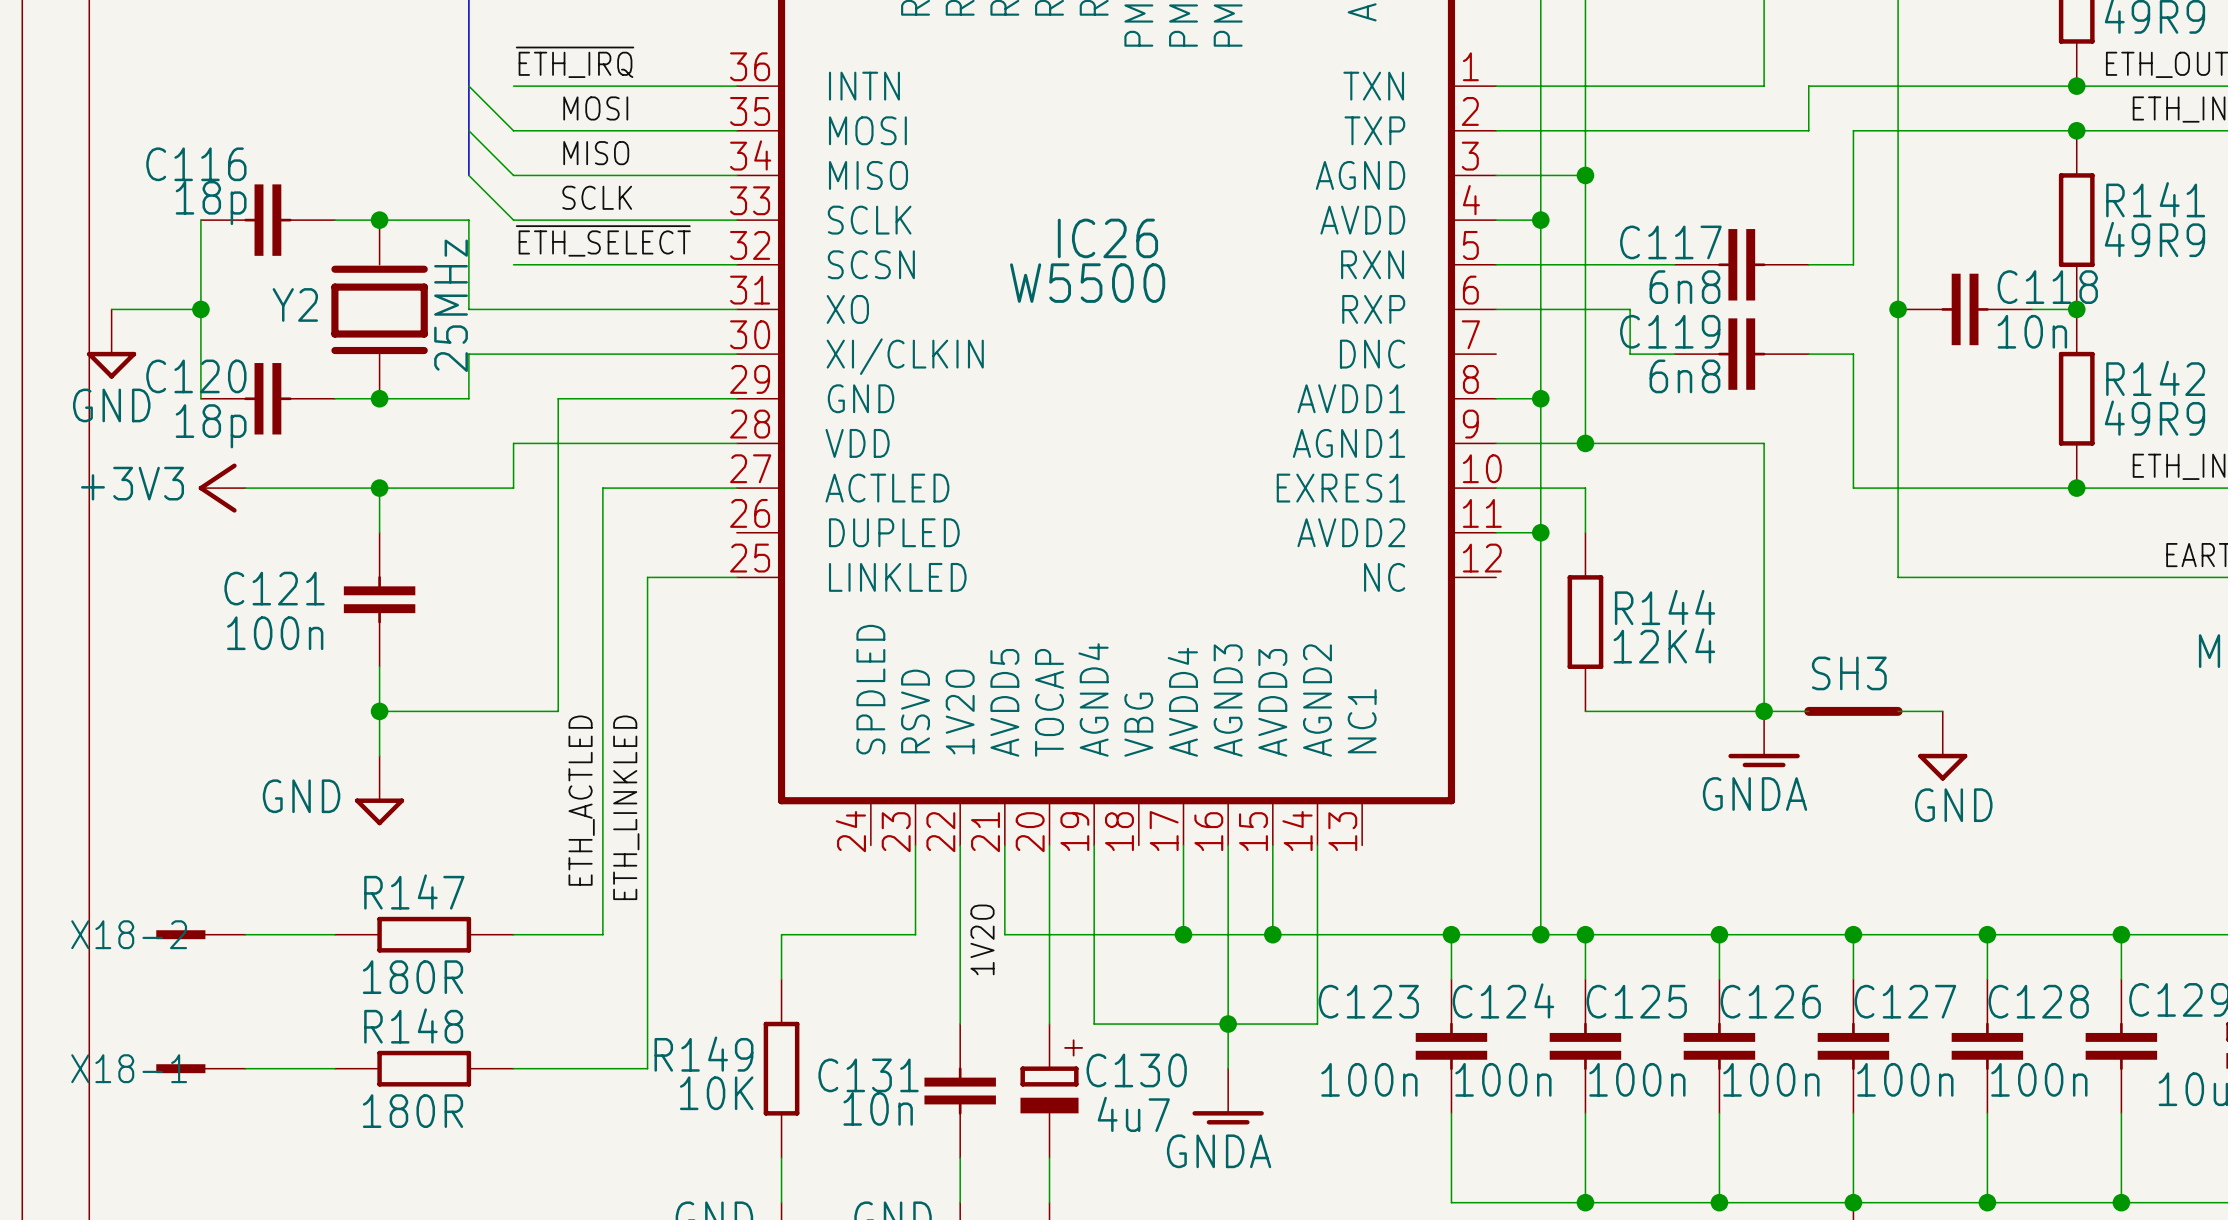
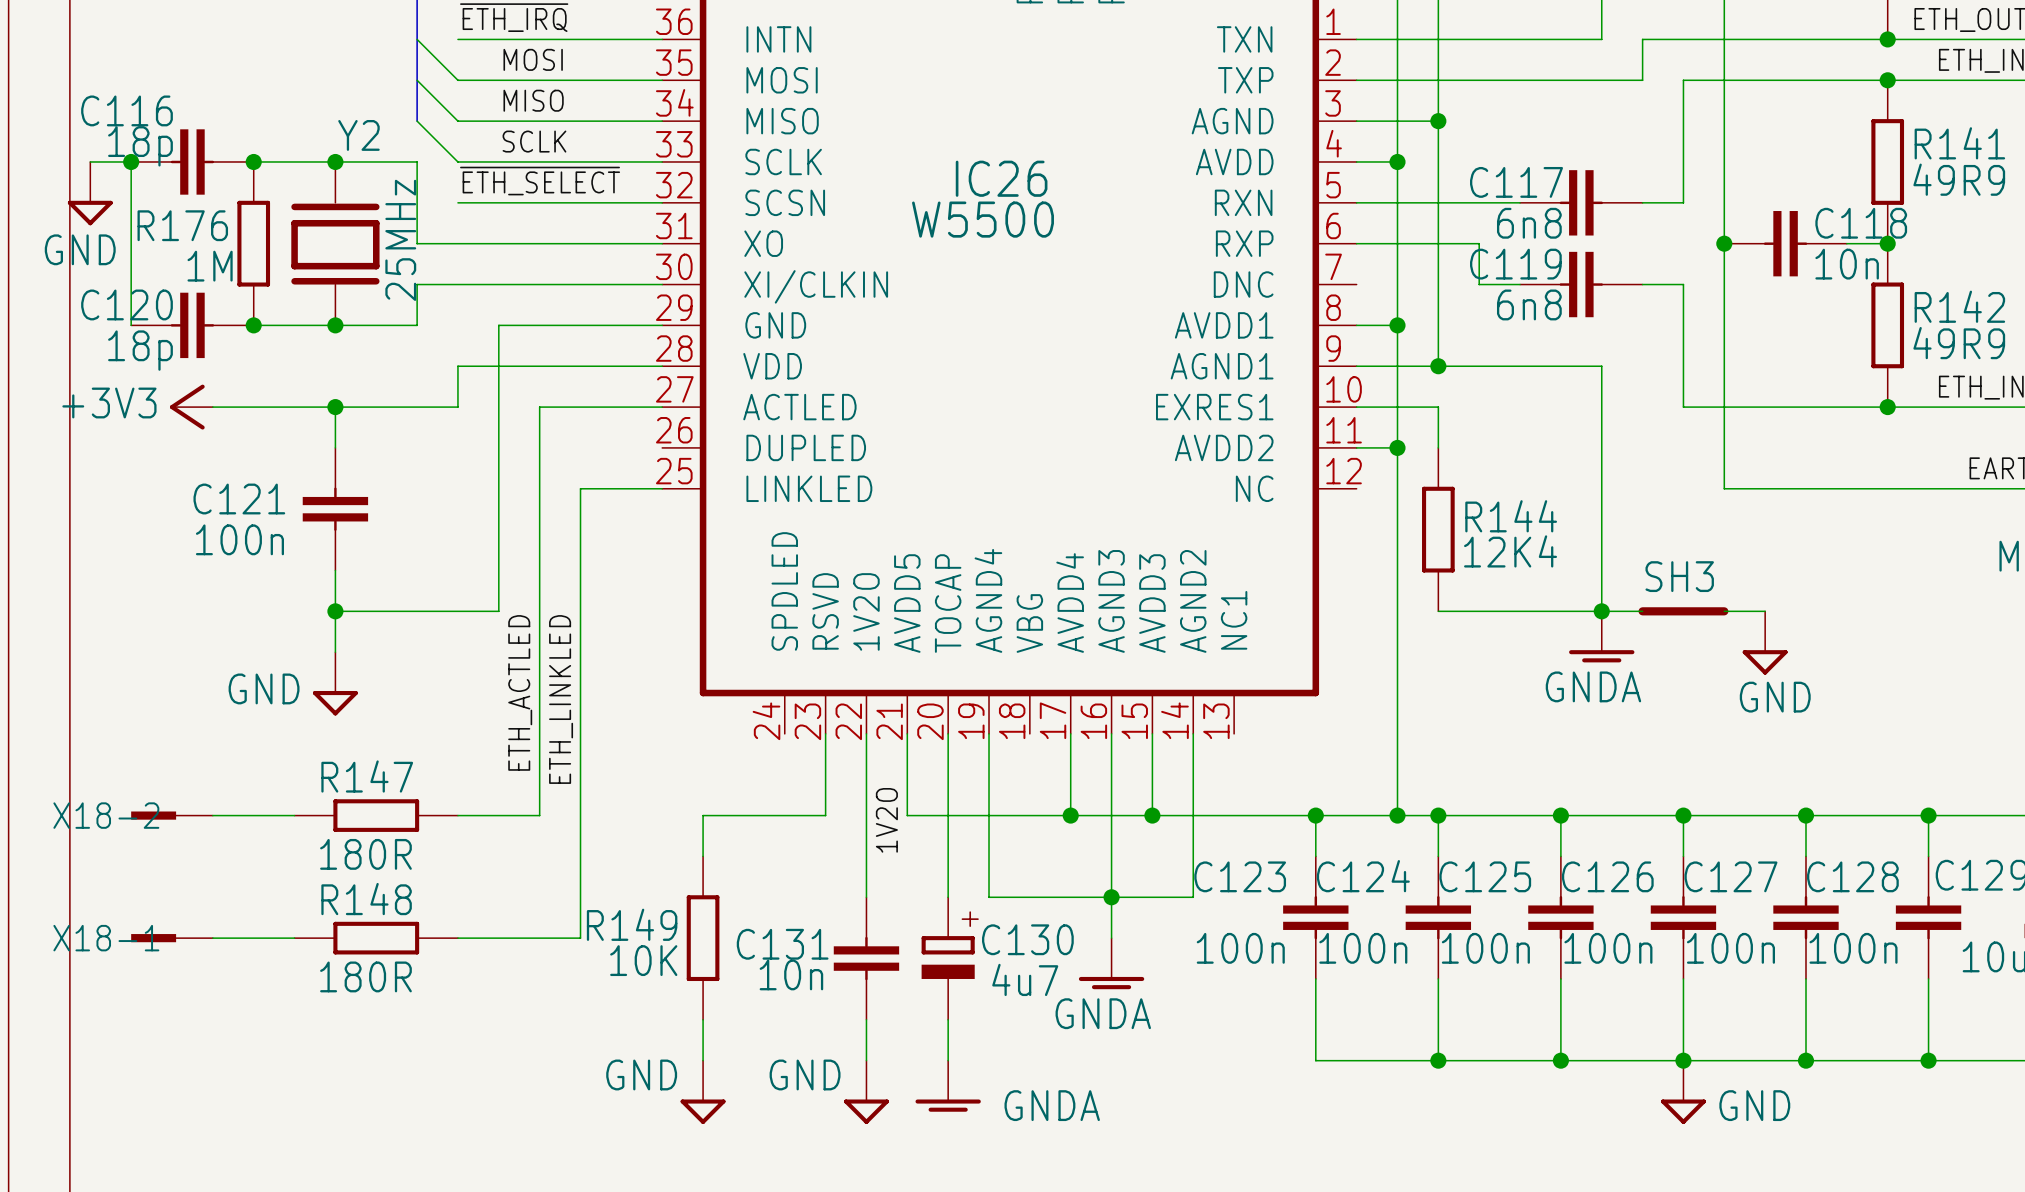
wire: none -> (90, 161) (131, 161) (131, 325)
junction: none -> (131, 161)
wire: (200, 220) (200, 398) -> none
C116 position: (267, 220) -> (192, 161)
junction: none -> (253, 161)
Y2 name position: Y2 (295, 304) -> Y2 (358, 135)
wire: (111, 309) (200, 309) -> none
junction: (200, 309) -> none
R176: none -> 1M (253, 243)
power symbol position: GND (111, 344) -> GND (90, 193)
C120 position: (267, 398) -> (192, 325)
junction: none -> (253, 325)
power symbol text position: GND (111, 405) -> GND (80, 249)

